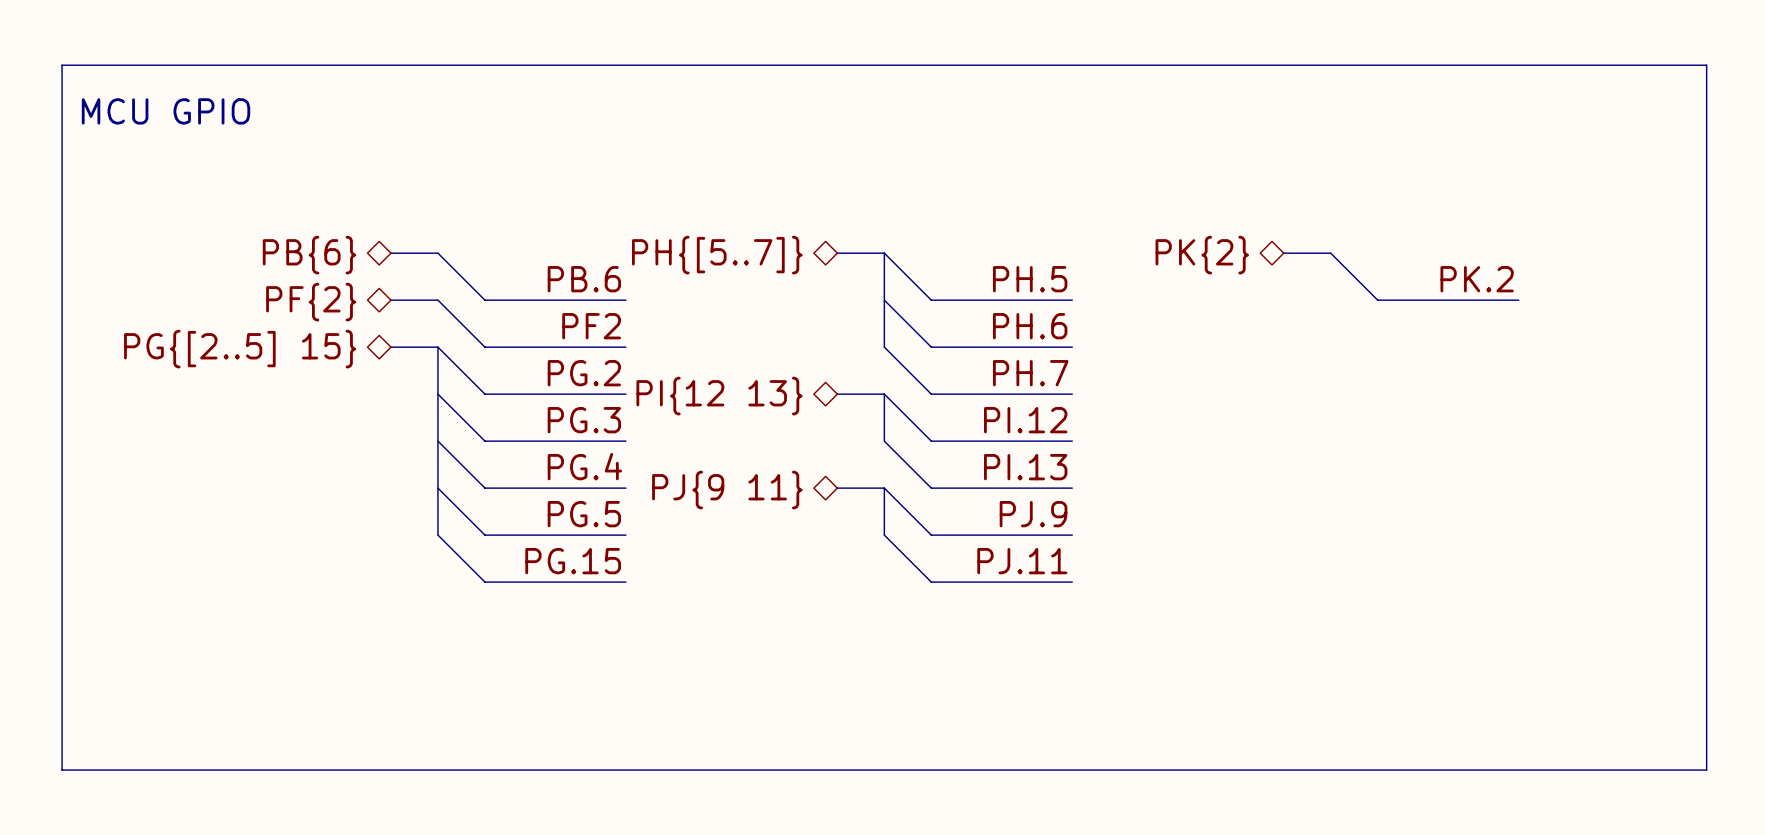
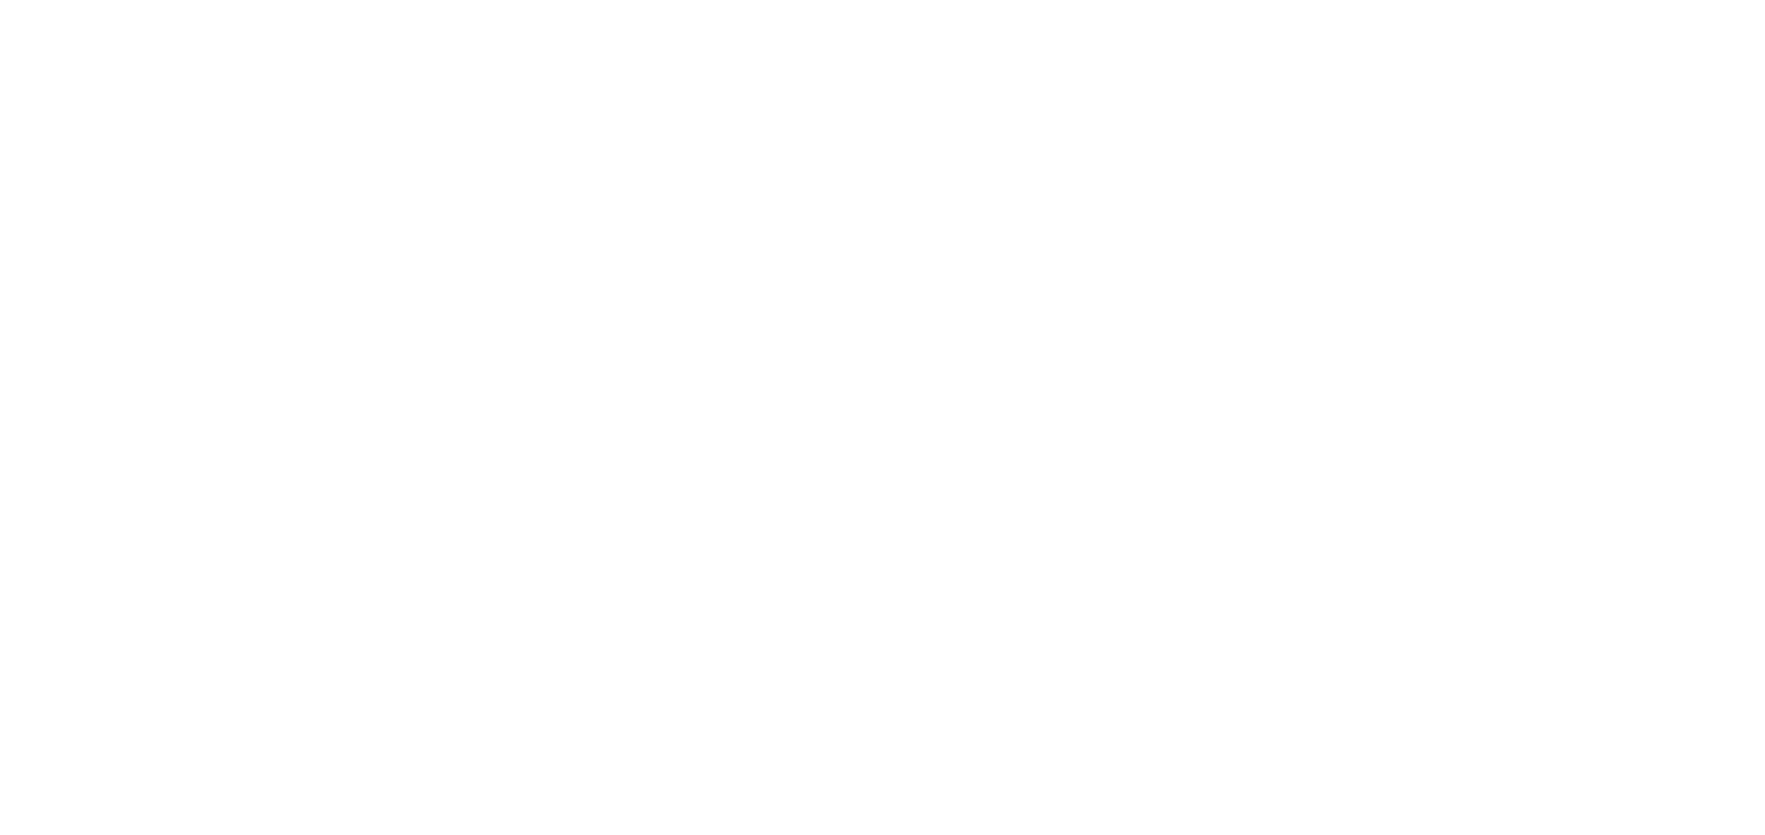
line: (62, 65) (1706, 65) (1706, 770) (62, 770) (62, 65) -> none
text: MCU GPIO (165, 111) -> none
bus: (390, 253) (437, 253) -> none
wire: (437, 253) (484, 300) (625, 300) -> none
bus: (837, 253) (884, 253) (884, 347) -> none
wire: (884, 253) (931, 300) (1072, 300) -> none
bus: (1283, 253) (1330, 253) -> none
wire: (1330, 253) (1377, 300) (1518, 300) -> none
hierarchical label: PB{6} (309, 255) -> none
hierarchical label: PH{[5..7]} (717, 255) -> none
hierarchical label: PK{2} (1202, 255) -> none
label: PB.6 (584, 279) -> none
label: PH.5 (1030, 279) -> none
label: PK.2 (1477, 279) -> none
bus: (390, 300) (437, 300) -> none
wire: (437, 300) (484, 347) (625, 347) -> none
wire: (884, 300) (931, 347) (1072, 347) -> none
hierarchical label: PF{2} (311, 302) -> none
label: PF2 (591, 326) -> none
label: PH.6 (1030, 326) -> none
bus: (390, 347) (437, 347) (437, 535) -> none
wire: (437, 347) (484, 394) (625, 394) -> none
wire: (884, 347) (931, 394) (1072, 394) -> none
hierarchical label: PG{[2..5] 15} (240, 349) -> none
label: PG.2 (584, 373) -> none
label: PH.7 (1030, 373) -> none
wire: (437, 394) (484, 441) (625, 441) -> none
bus: (837, 394) (884, 394) (884, 441) -> none
wire: (884, 394) (931, 441) (1072, 441) -> none
hierarchical label: PI{12 13} (719, 396) -> none
label: PG.3 (584, 420) -> none
label: PI.12 (1025, 420) -> none
wire: (437, 441) (484, 488) (625, 488) -> none
wire: (884, 441) (931, 488) (1072, 488) -> none
label: PG.4 (584, 466) -> none
label: PI.13 (1025, 467) -> none
wire: (437, 488) (484, 535) (625, 535) -> none
bus: (837, 488) (884, 488) (884, 535) -> none
wire: (884, 488) (931, 535) (1072, 535) -> none
hierarchical label: PJ{9 11} (727, 490) -> none
label: PG.5 (584, 514) -> none
label: PJ.9 (1033, 514) -> none
wire: (437, 535) (484, 582) (625, 582) -> none
wire: (884, 535) (931, 582) (1072, 582) -> none
label: PG.15 (573, 561) -> none
label: PJ.11 (1022, 561) -> none

